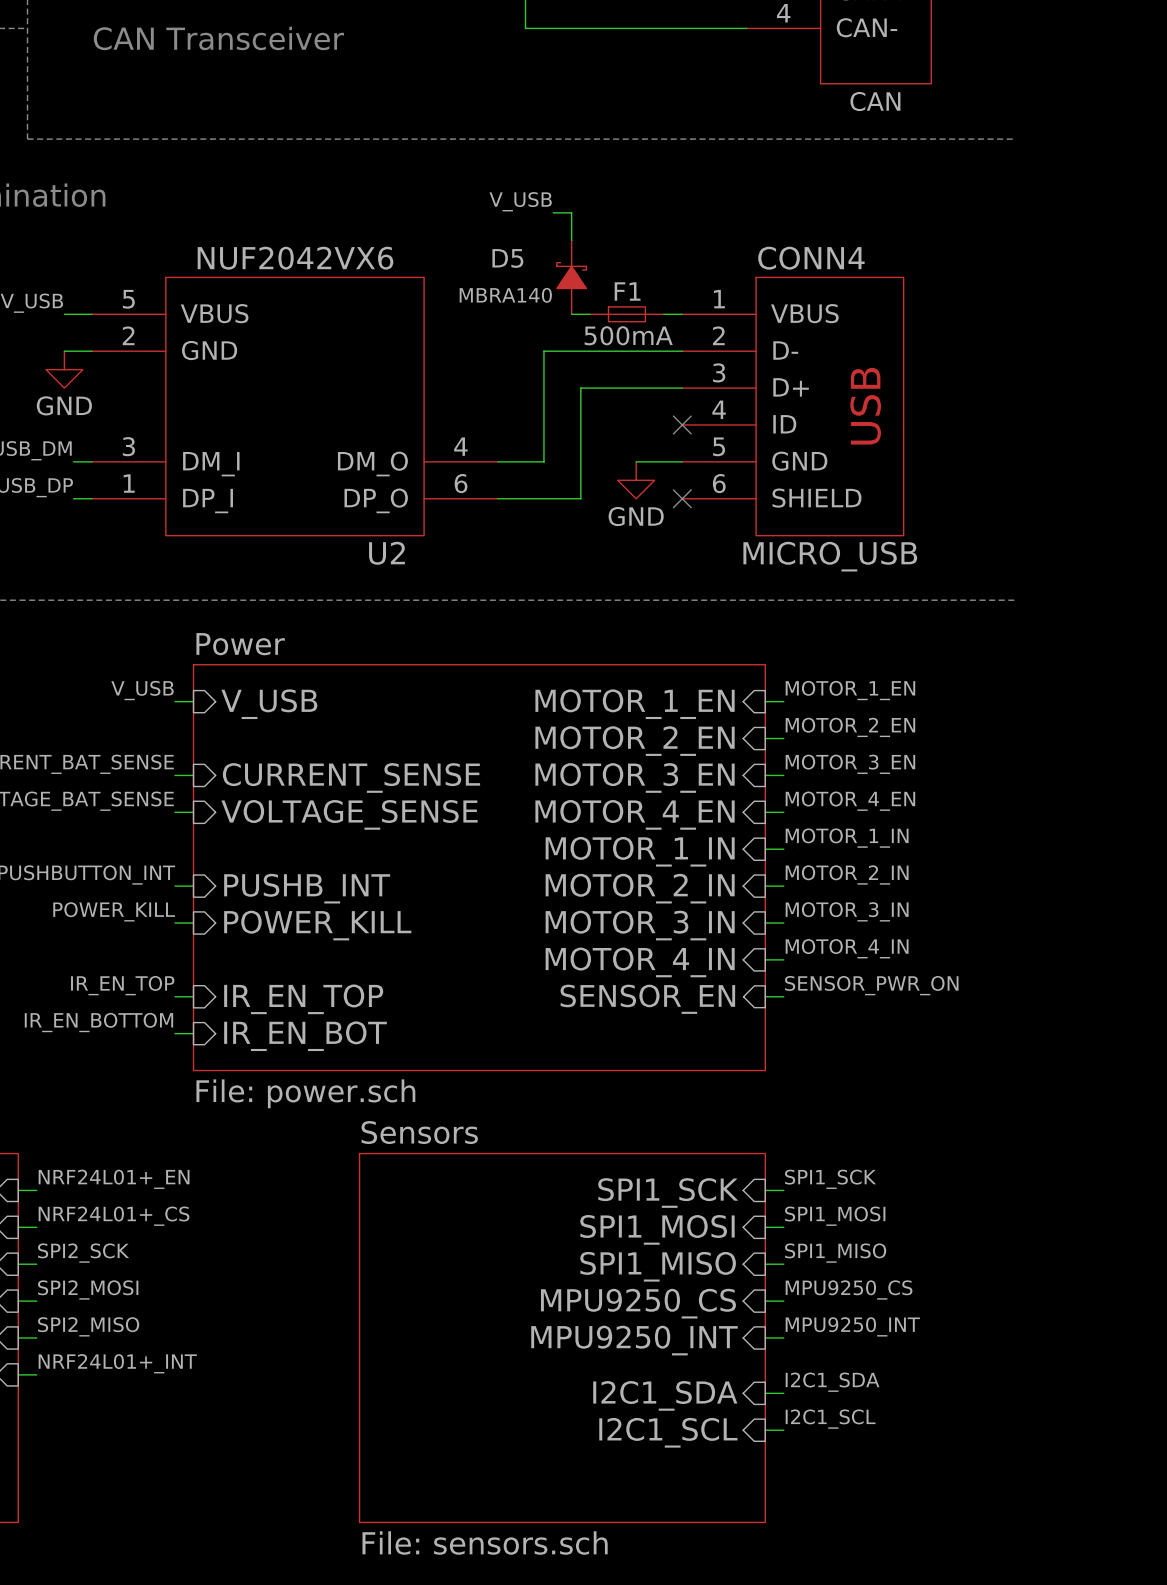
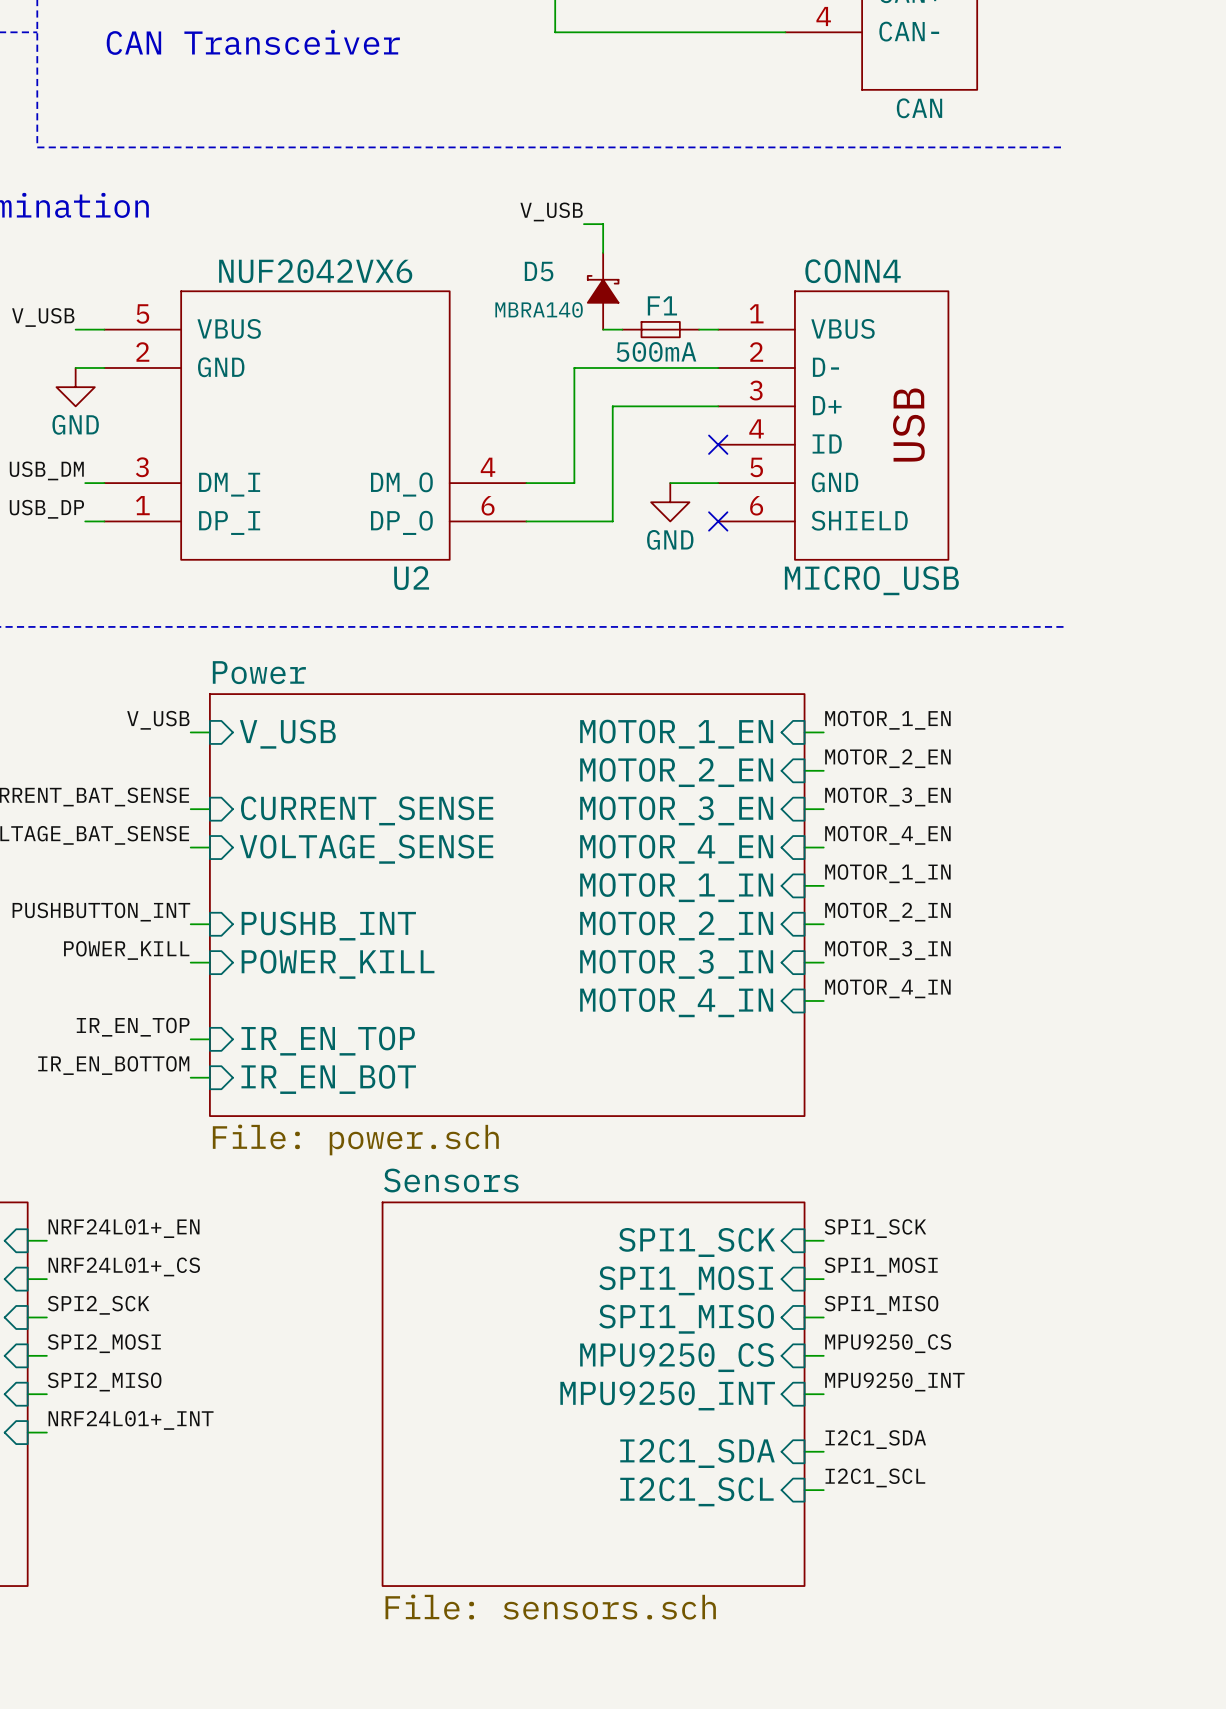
label: SENSOR_PWR_ON (871, 985) -> none
wire: (765, 996) (783, 996) -> none
sheet pin: SENSOR_EN (647, 999) -> none

